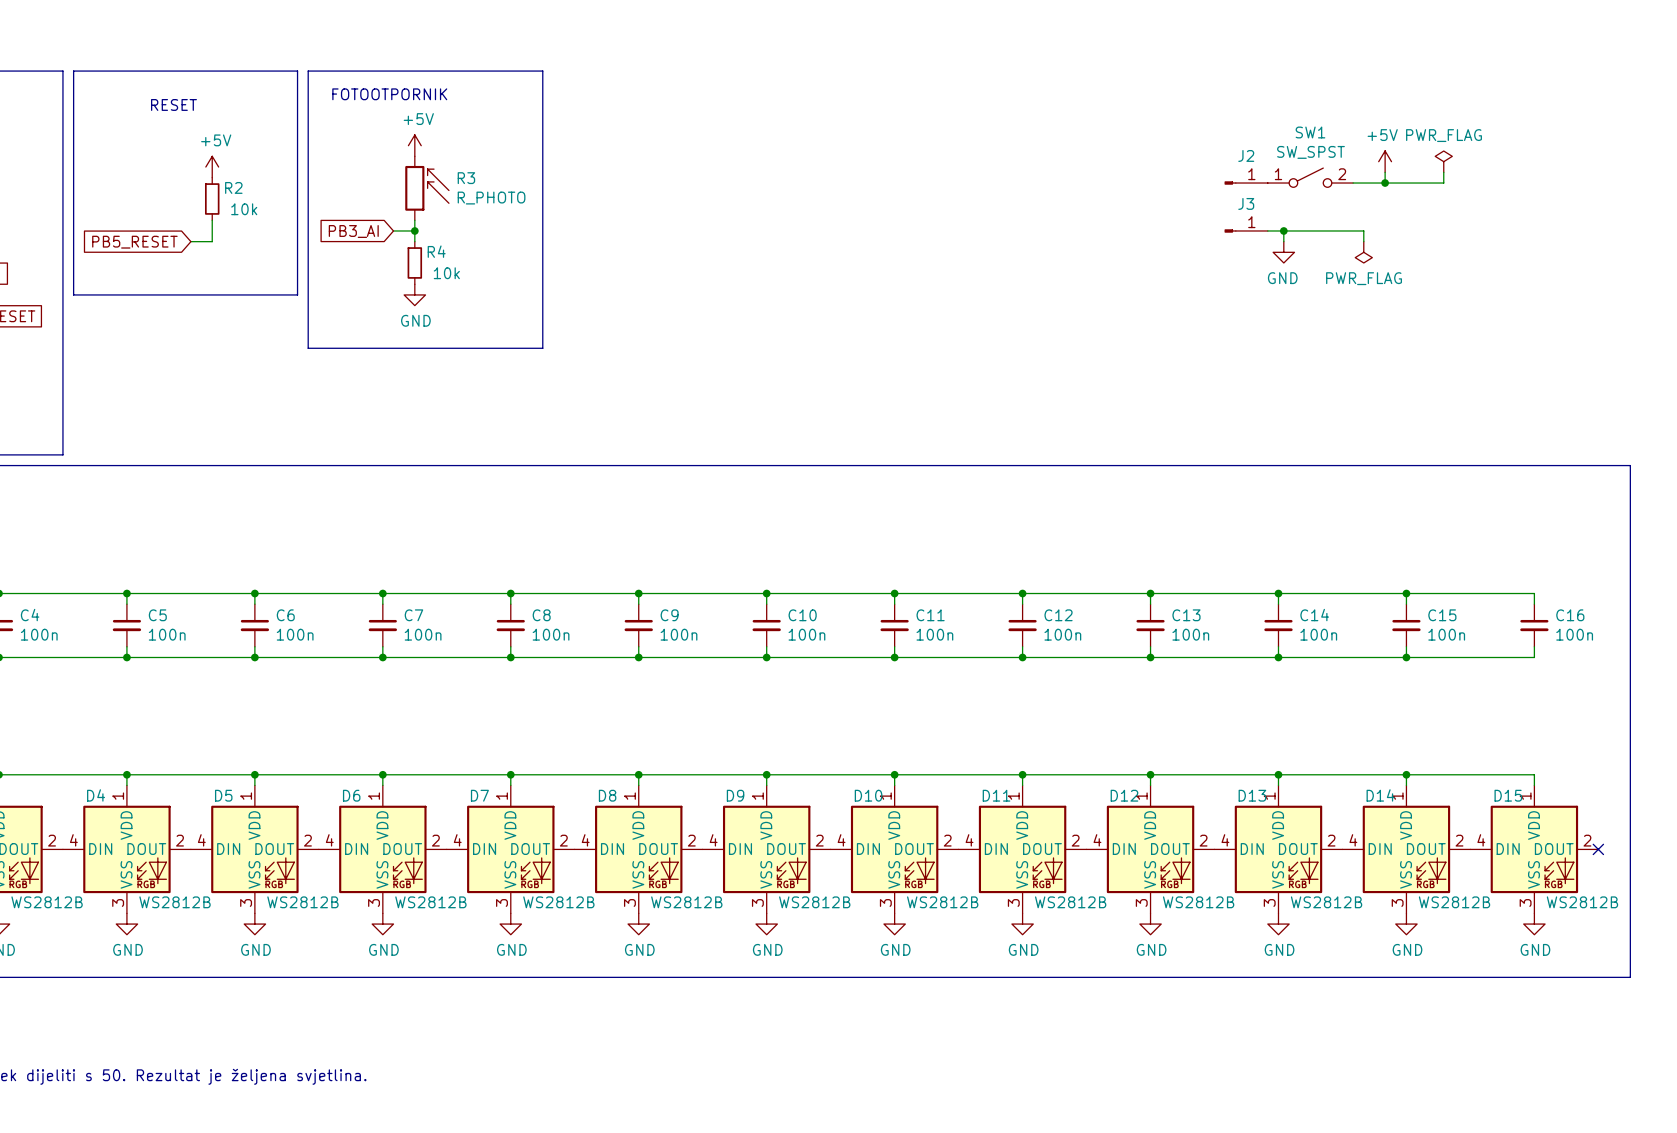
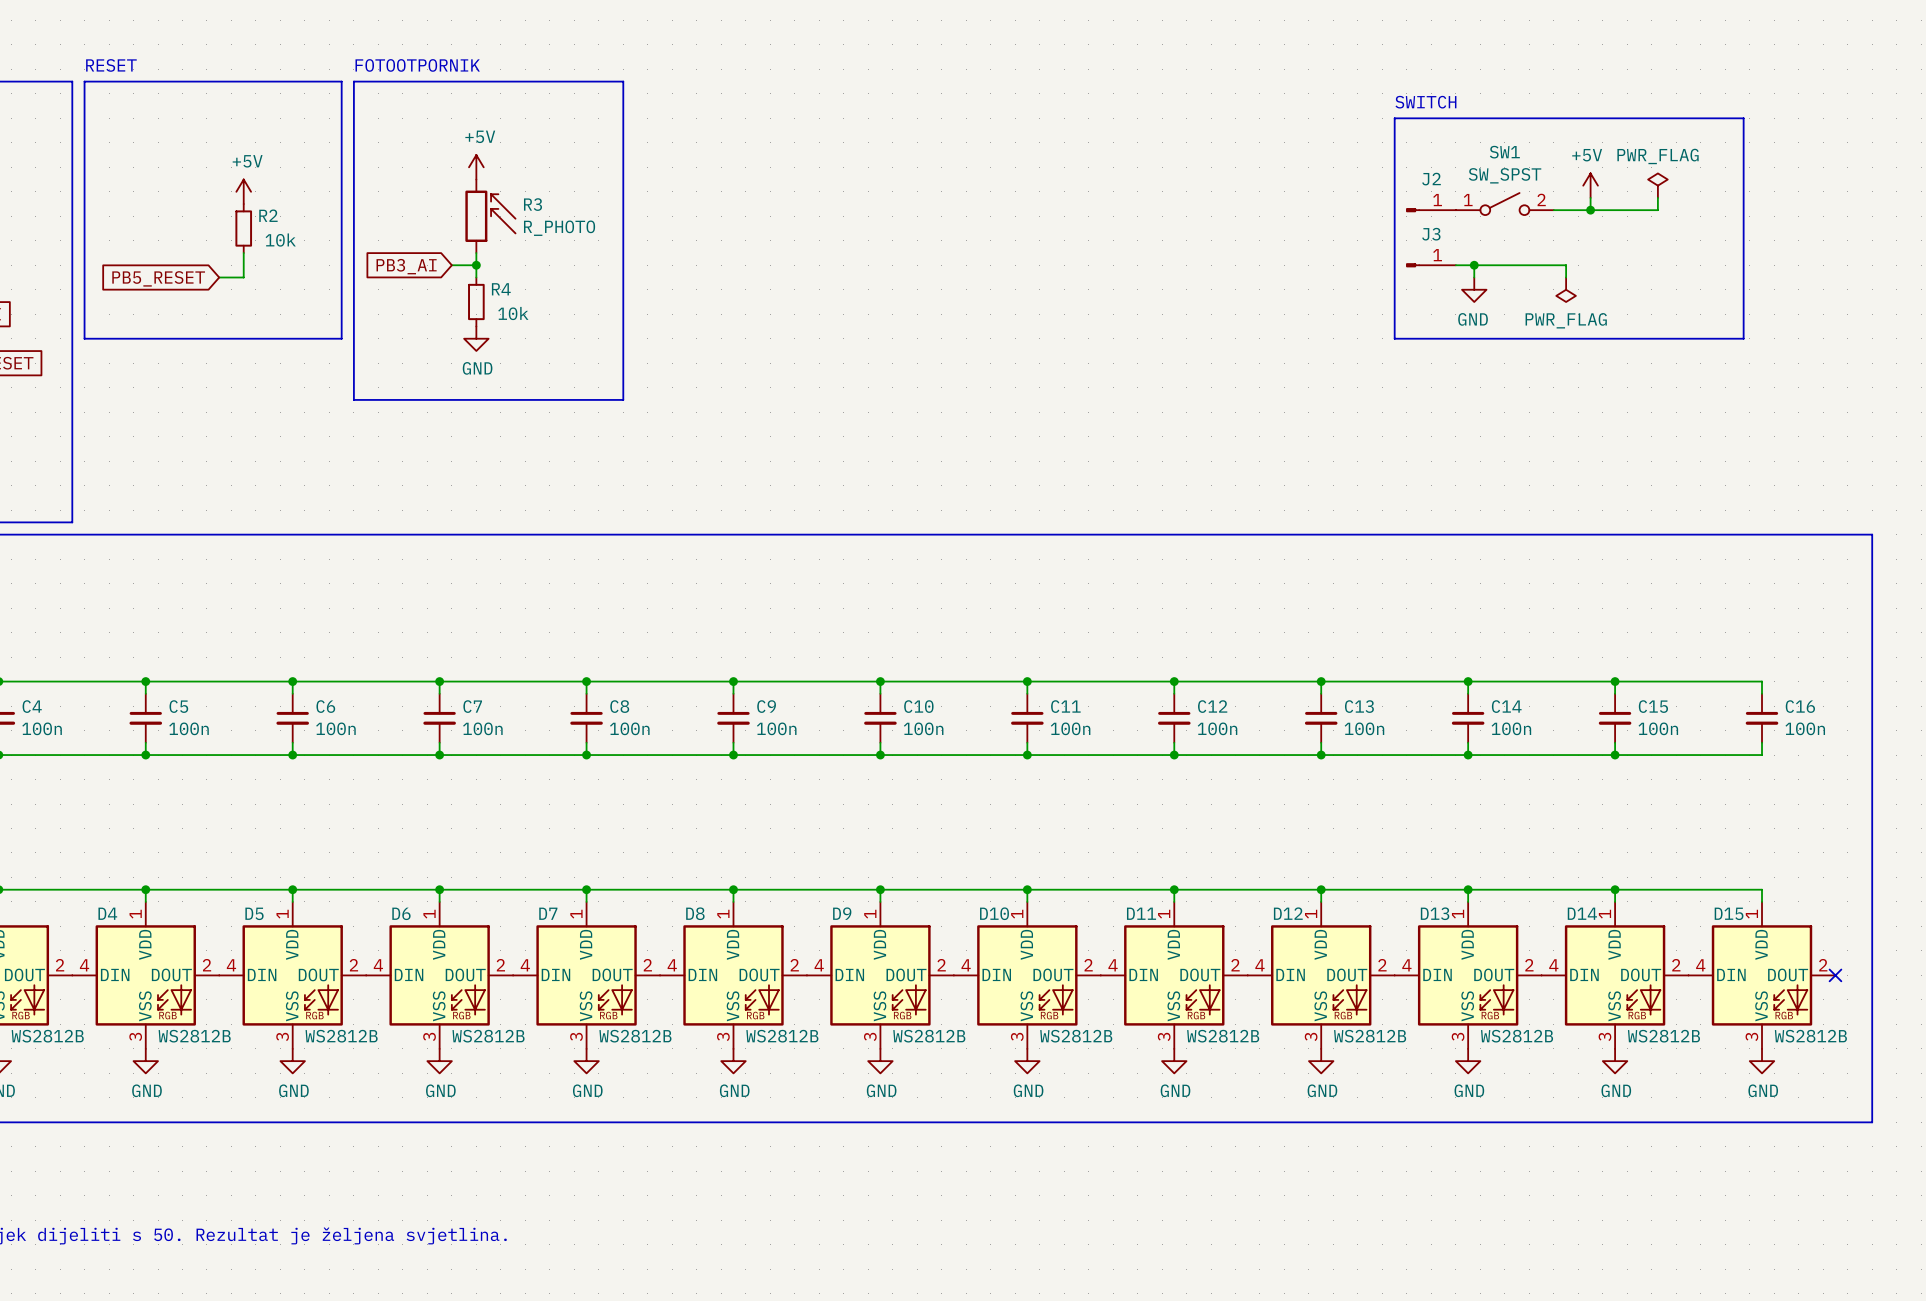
text: none -> SWITCH (1425, 102)
text position: FOTOOTPORNIK (389, 94) -> FOTOOTPORNIK (417, 65)
line: none -> (1394, 118) (1743, 118) (1743, 338) (1394, 338) (1394, 118)
text position: RESET (173, 104) -> RESET (111, 65)

